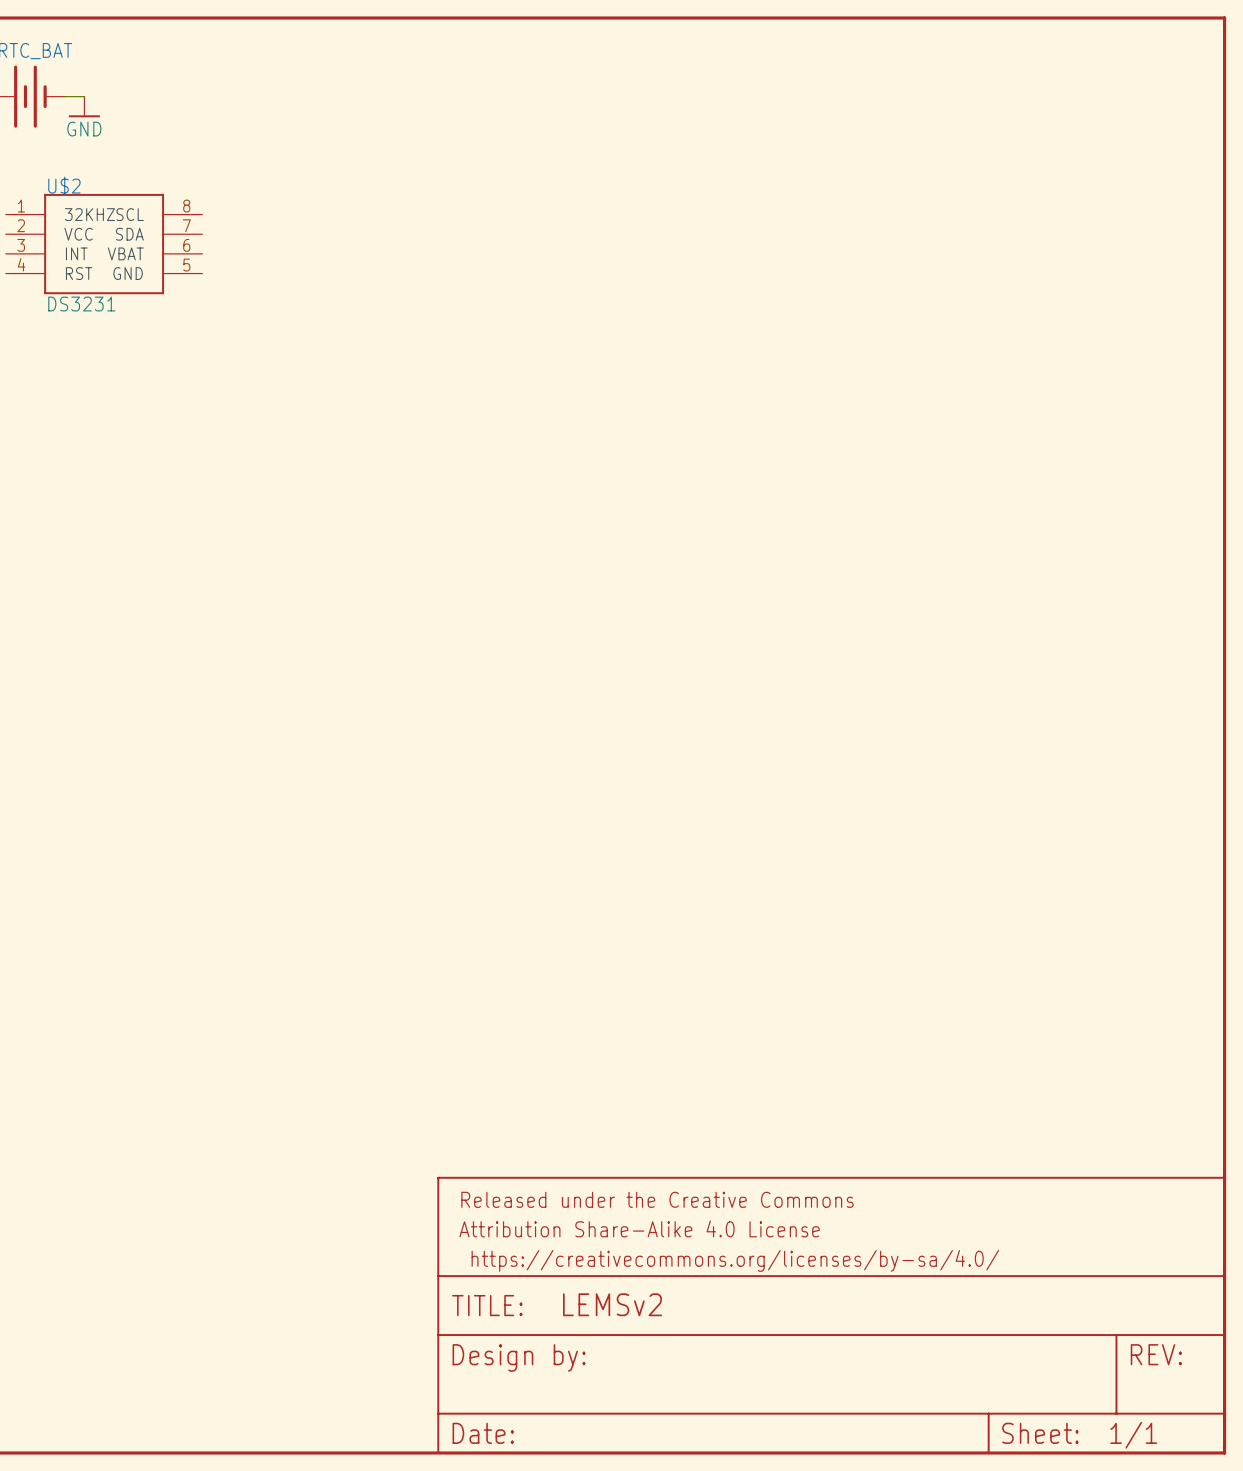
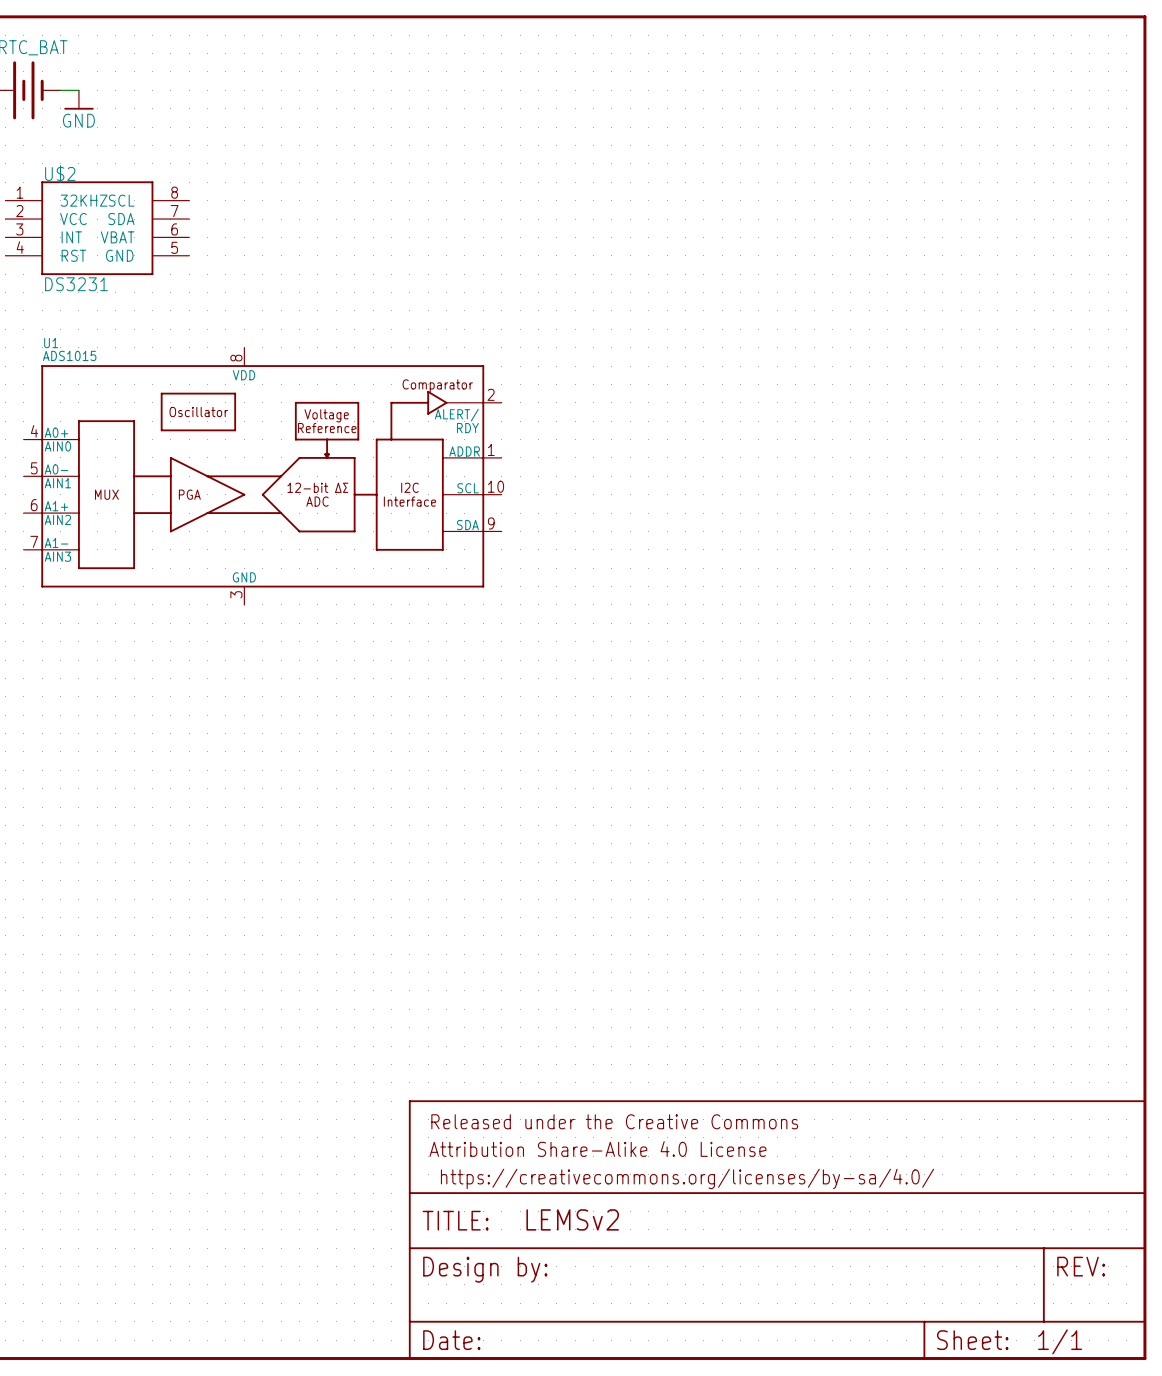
U1: none -> ADS1015 (262, 476)

